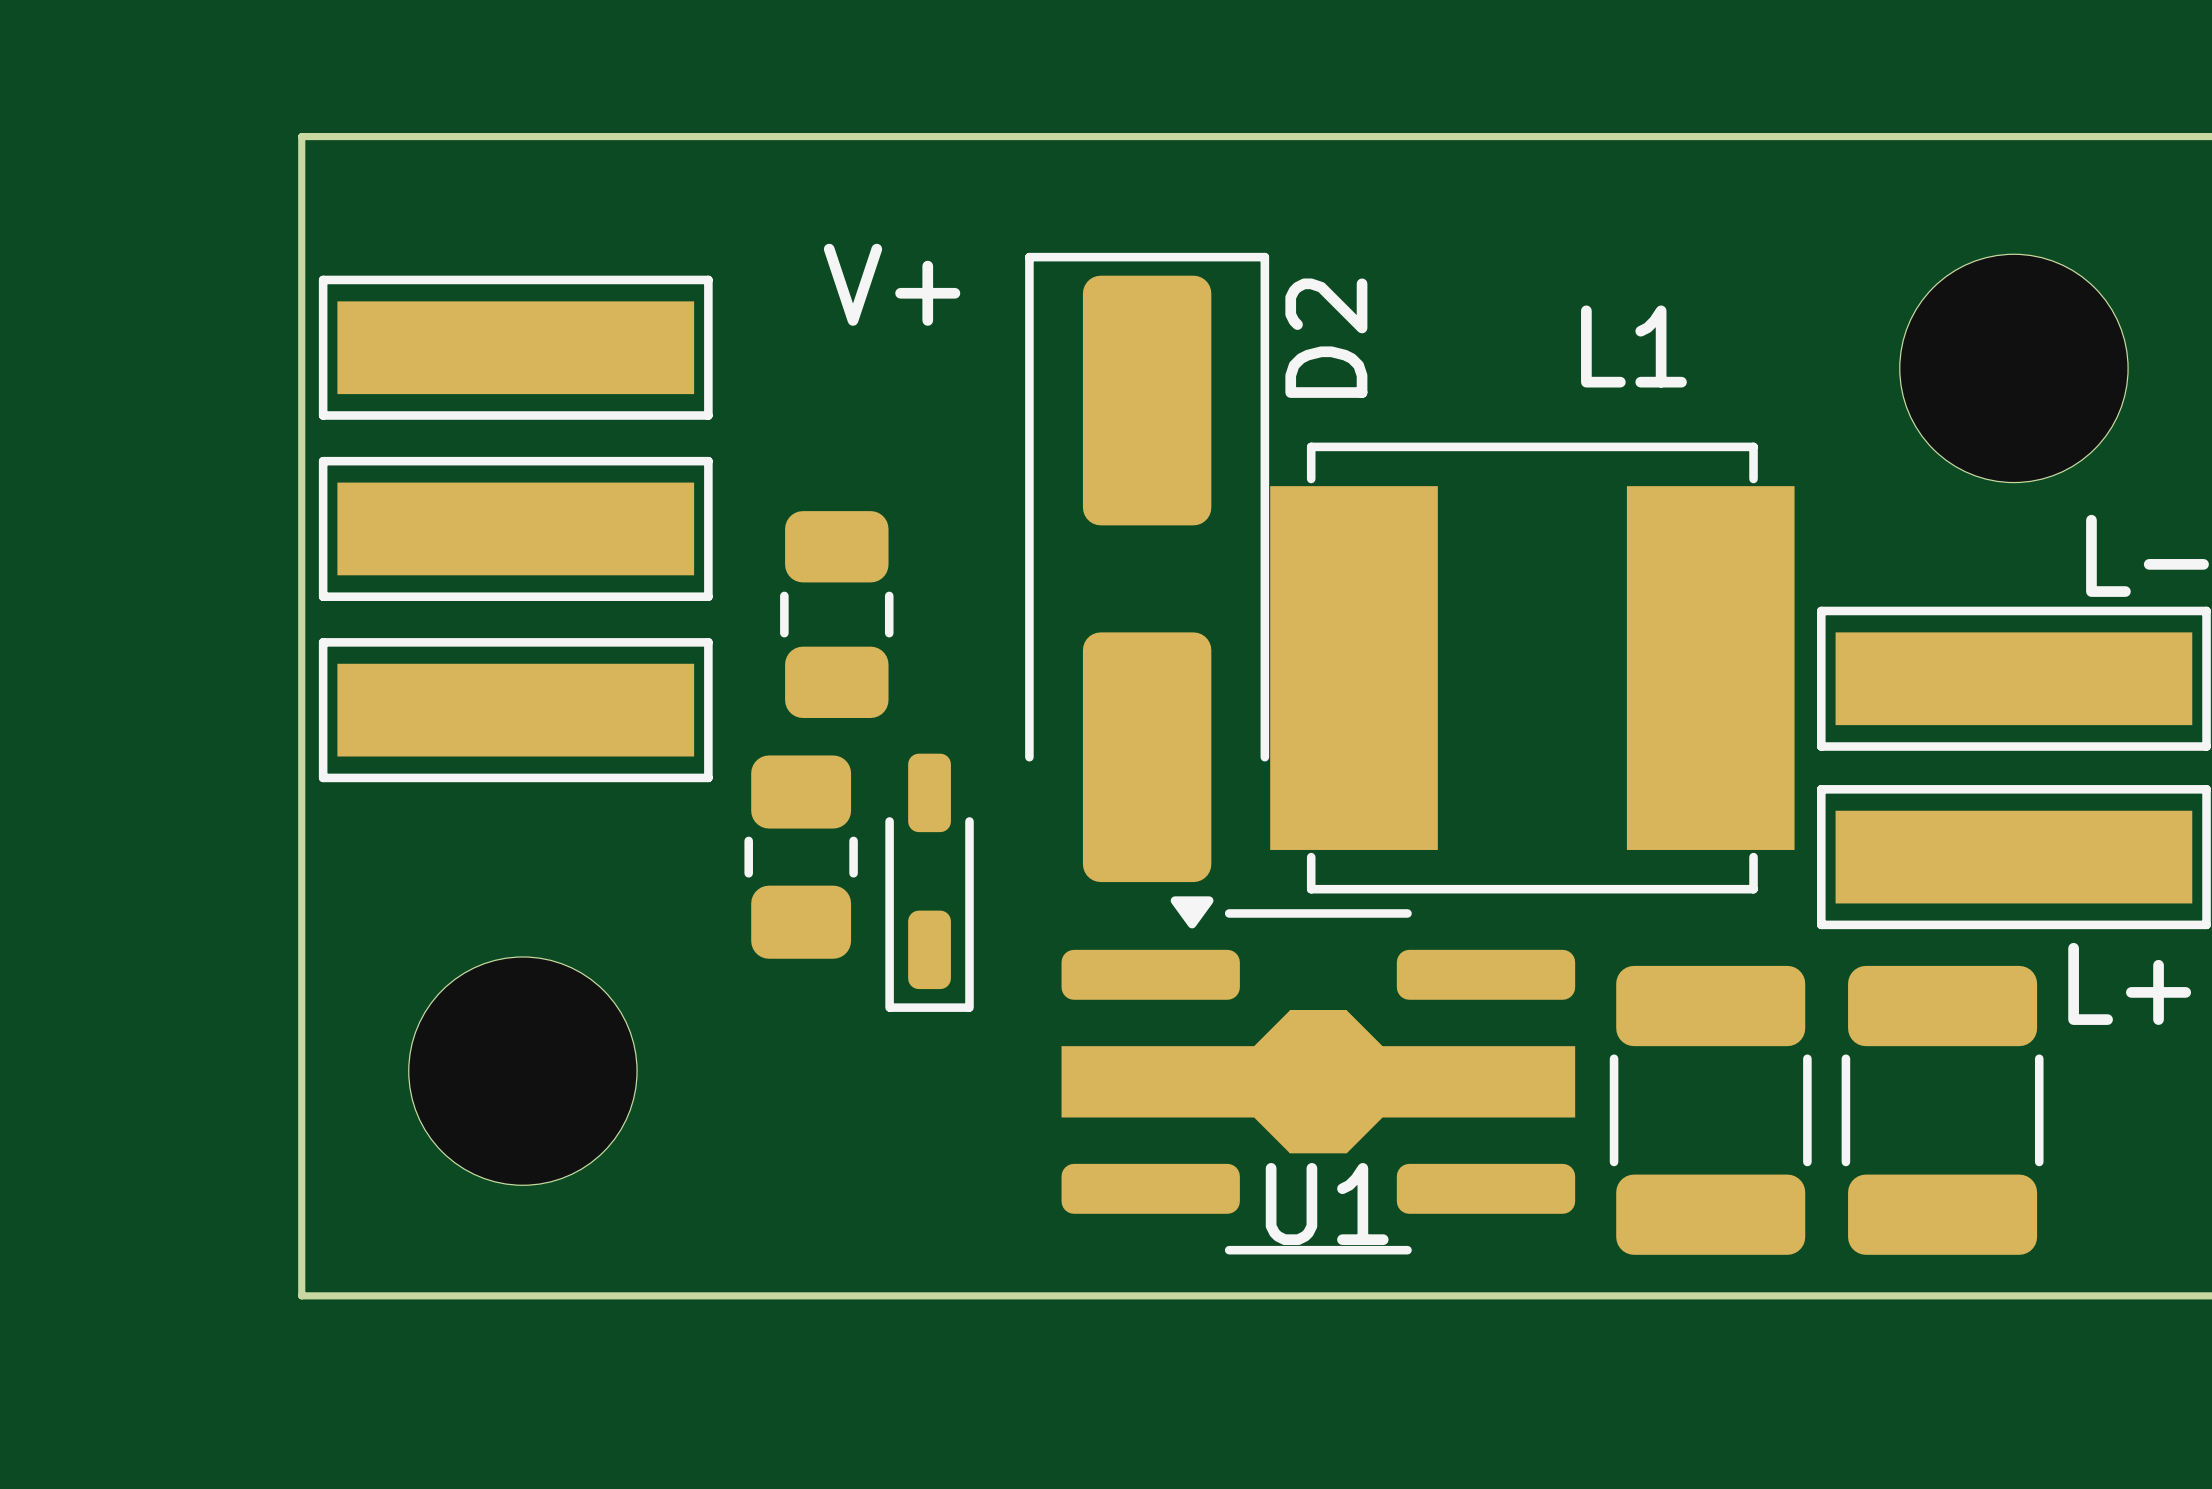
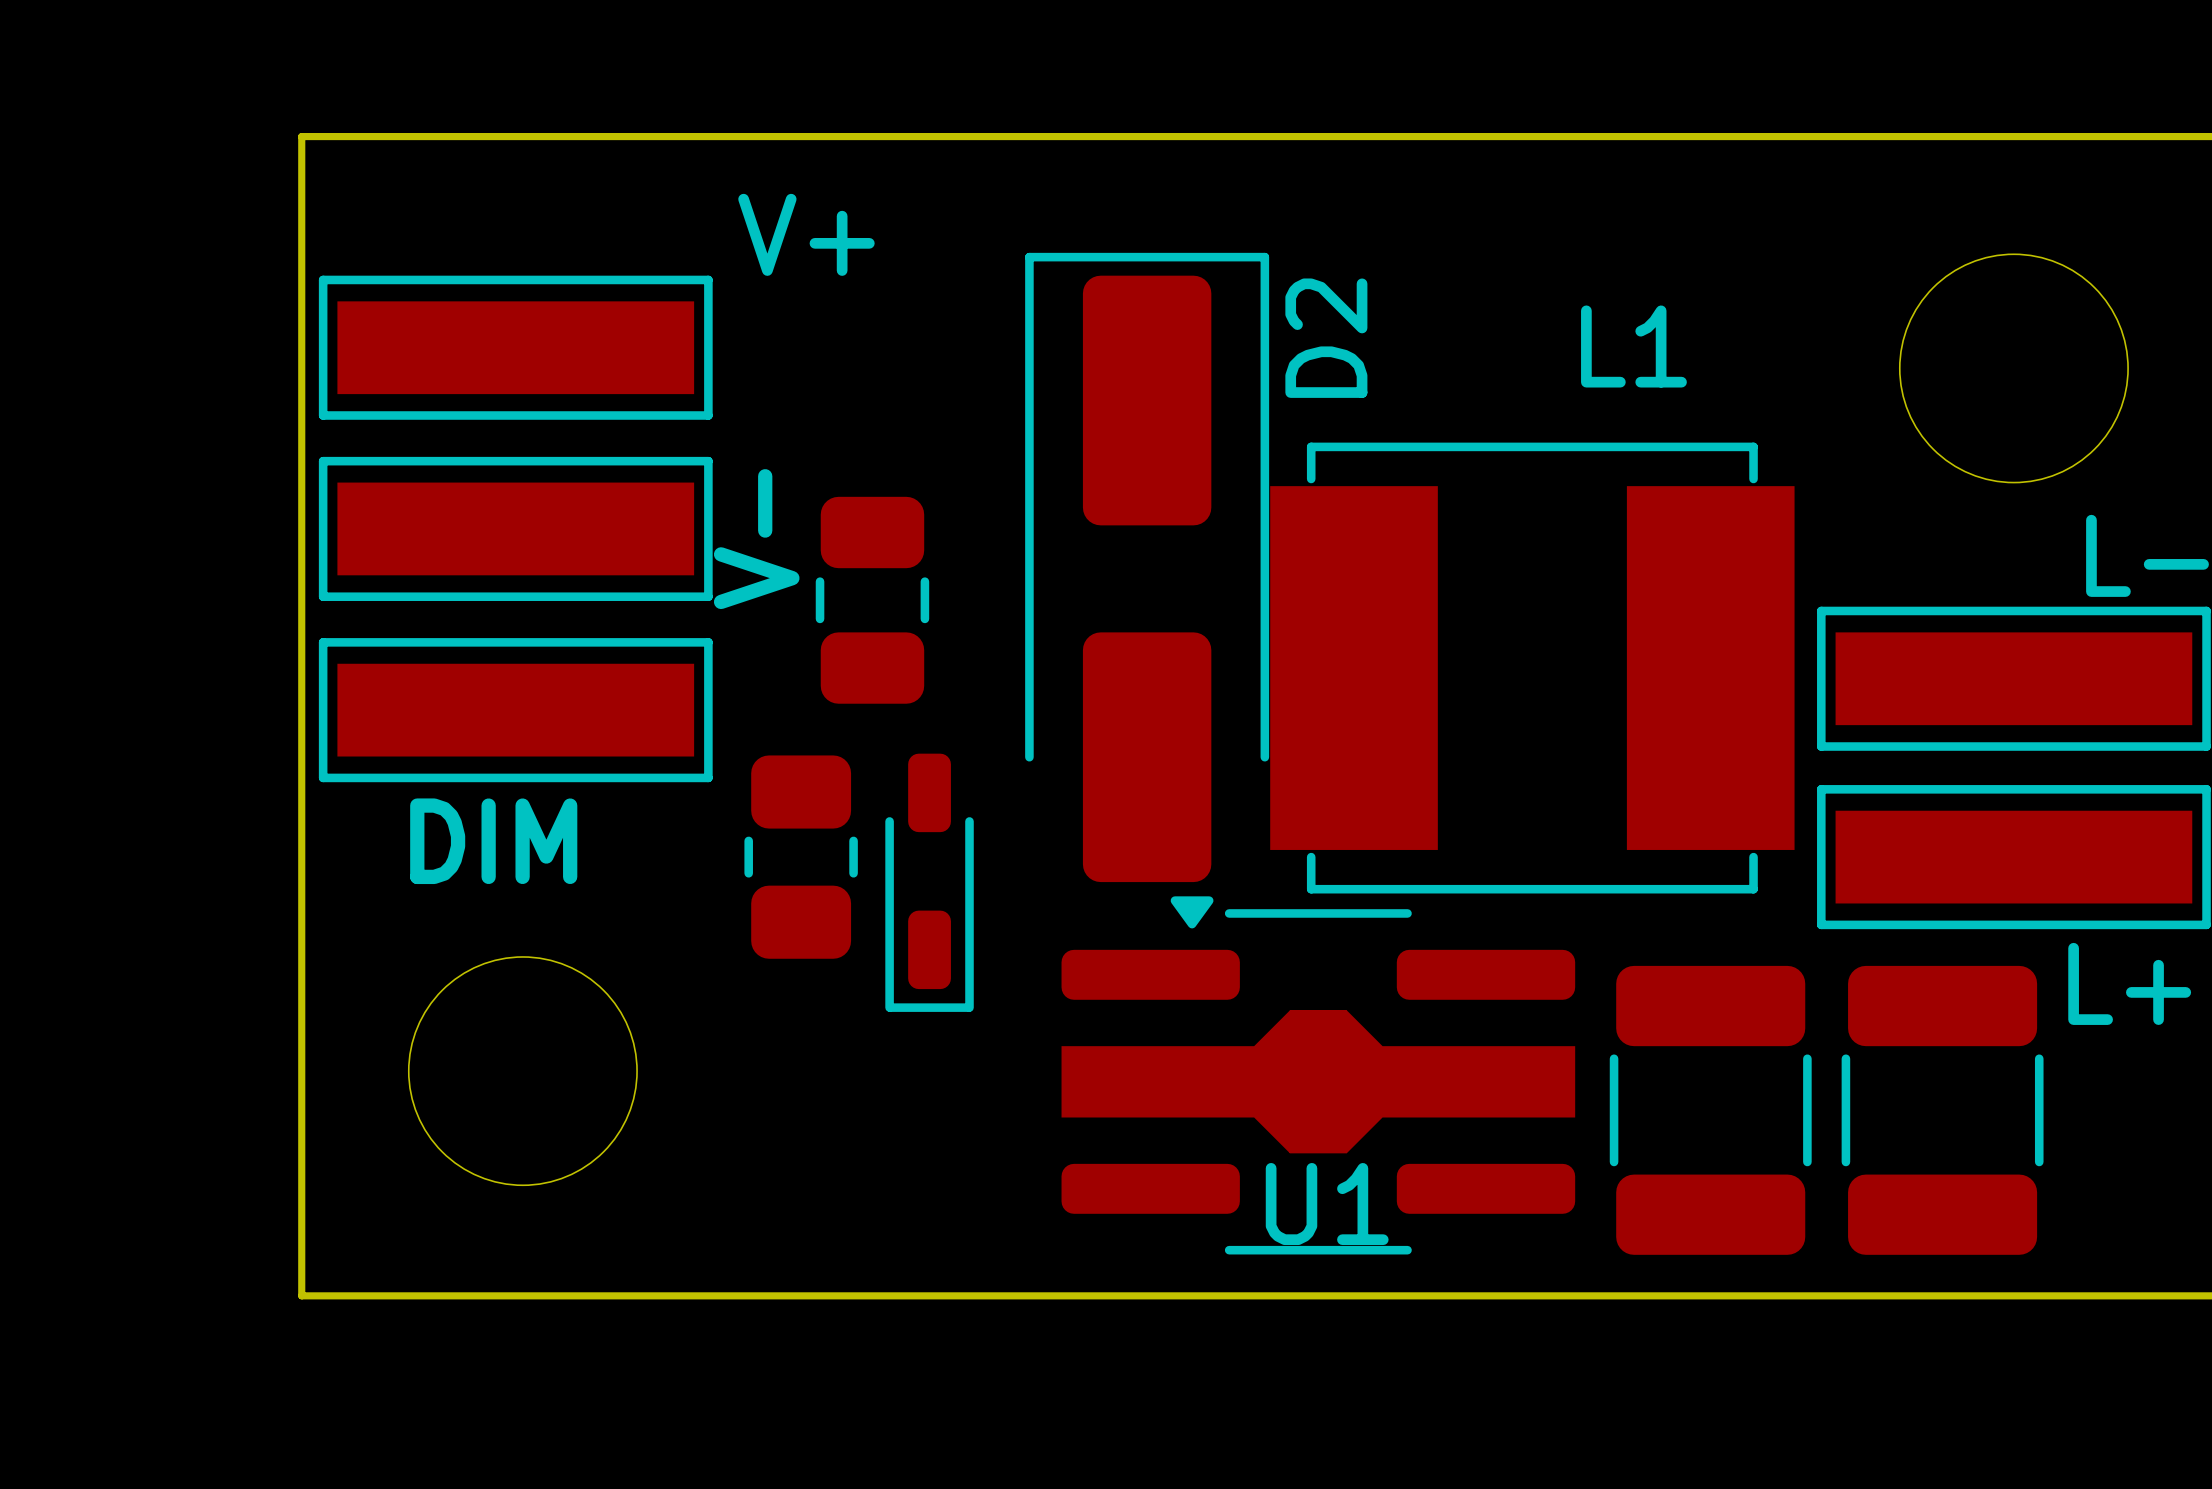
text position: V+ (892, 284) -> V+ (806, 234)
text: none -> V- (756, 539)
part position: (836, 614) -> (872, 600)
text: none -> DIM (493, 841)

